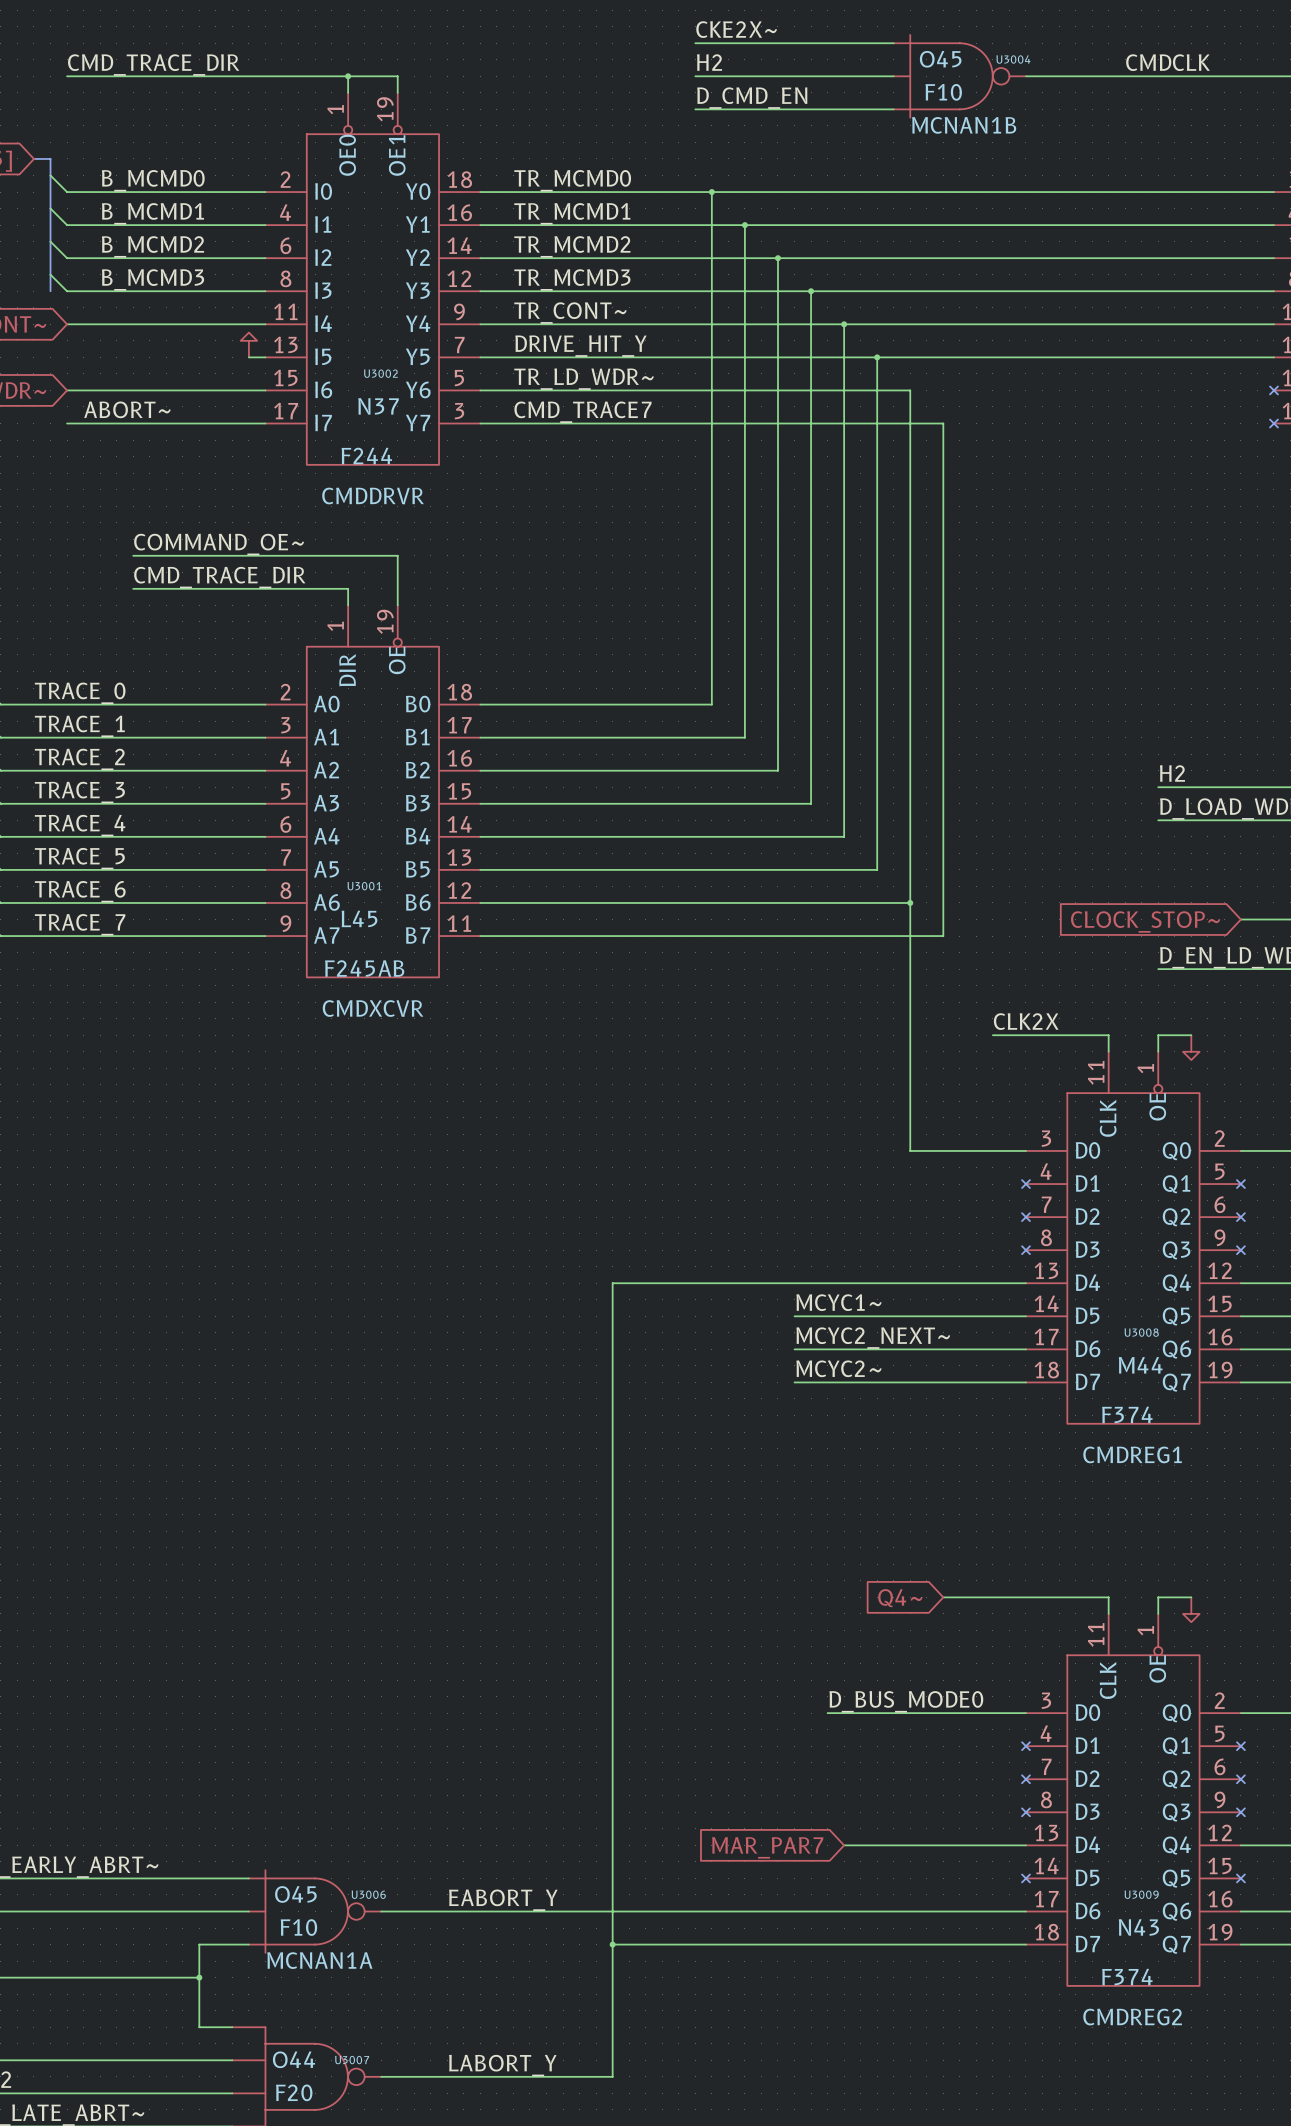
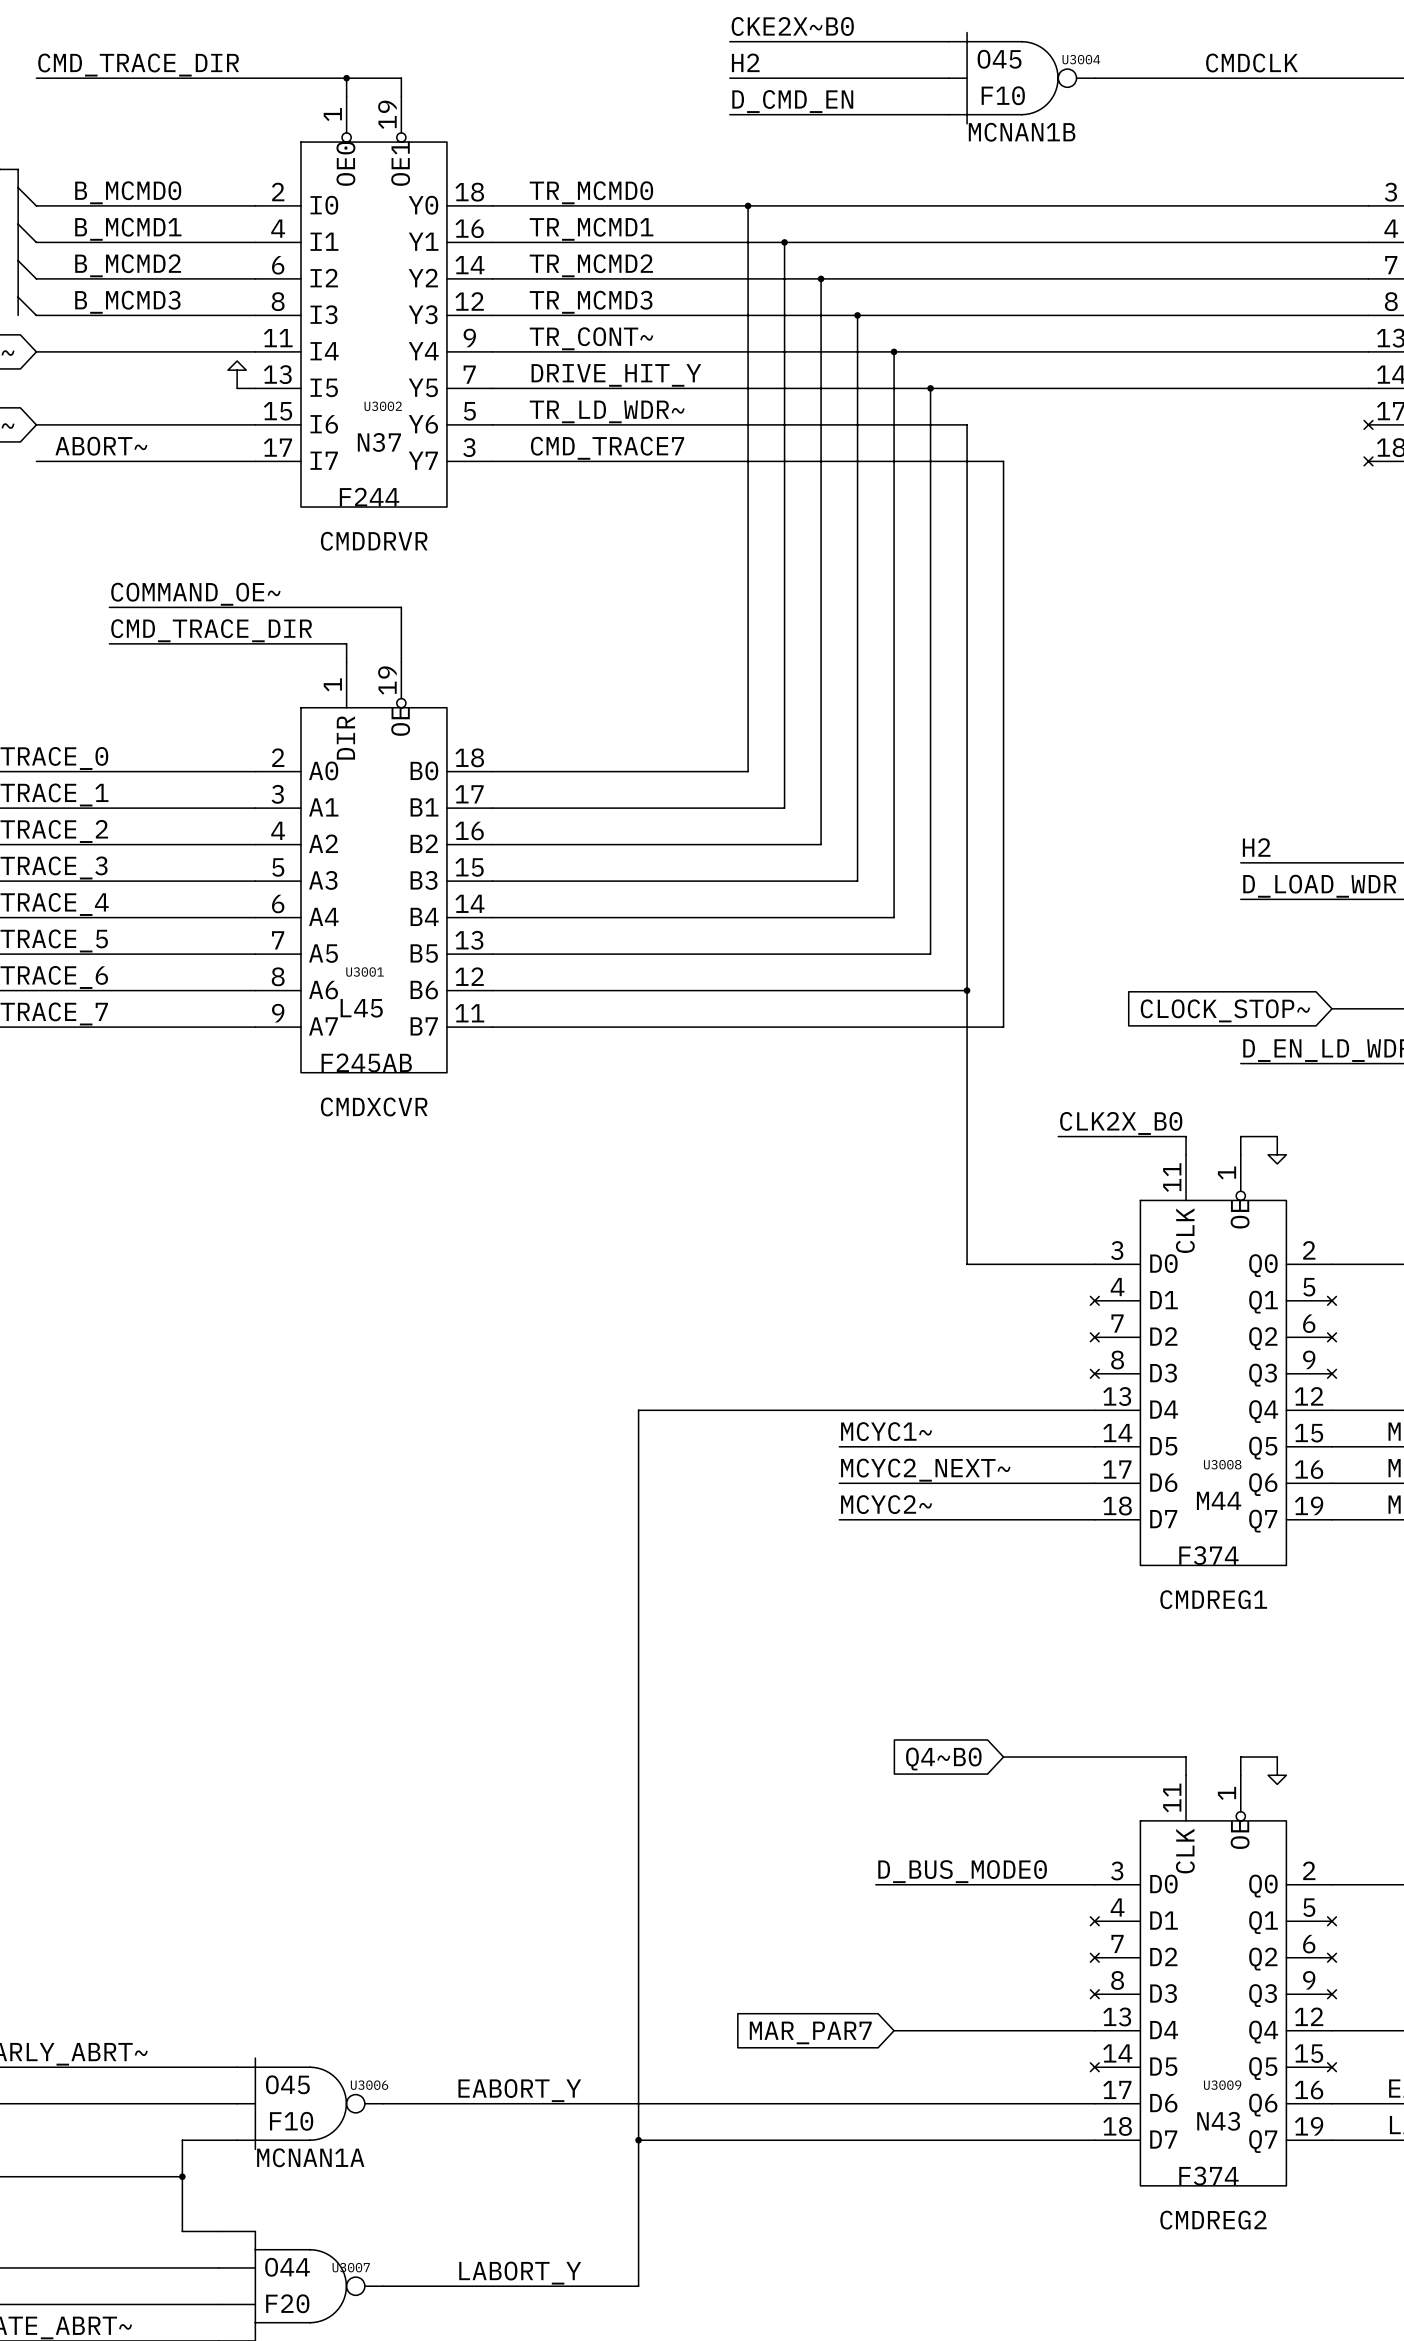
label: CKE2X~ (736, 29) -> CKE2X~B0 (792, 26)
label: CLK2X (1026, 1021) -> CLK2X_B0 (1121, 1123)
global label: Q4~ (900, 1598) -> Q4~B0 (943, 1759)

